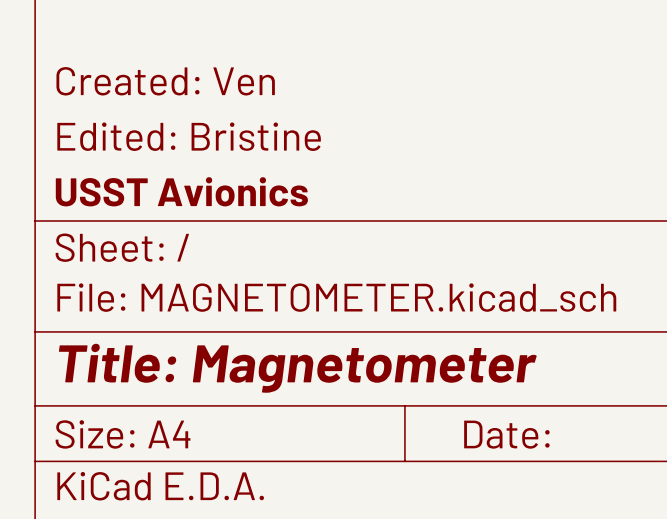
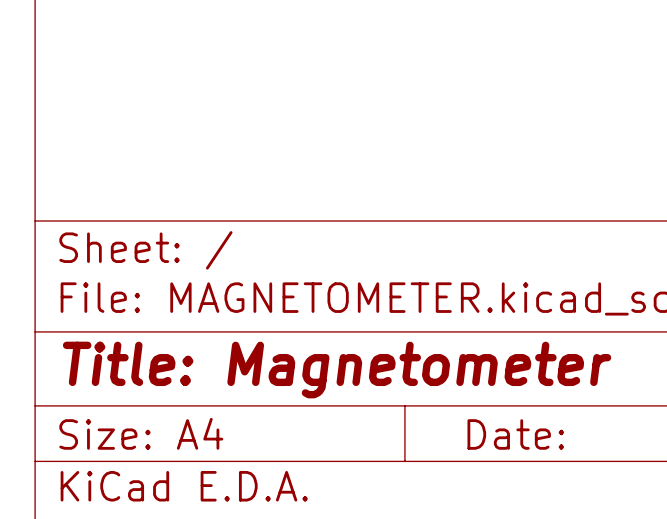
title block: Created: Ven (165, 81) -> none
title block: Edited: Bristine (189, 136) -> none
title block: USST Avionics (181, 191) -> none

